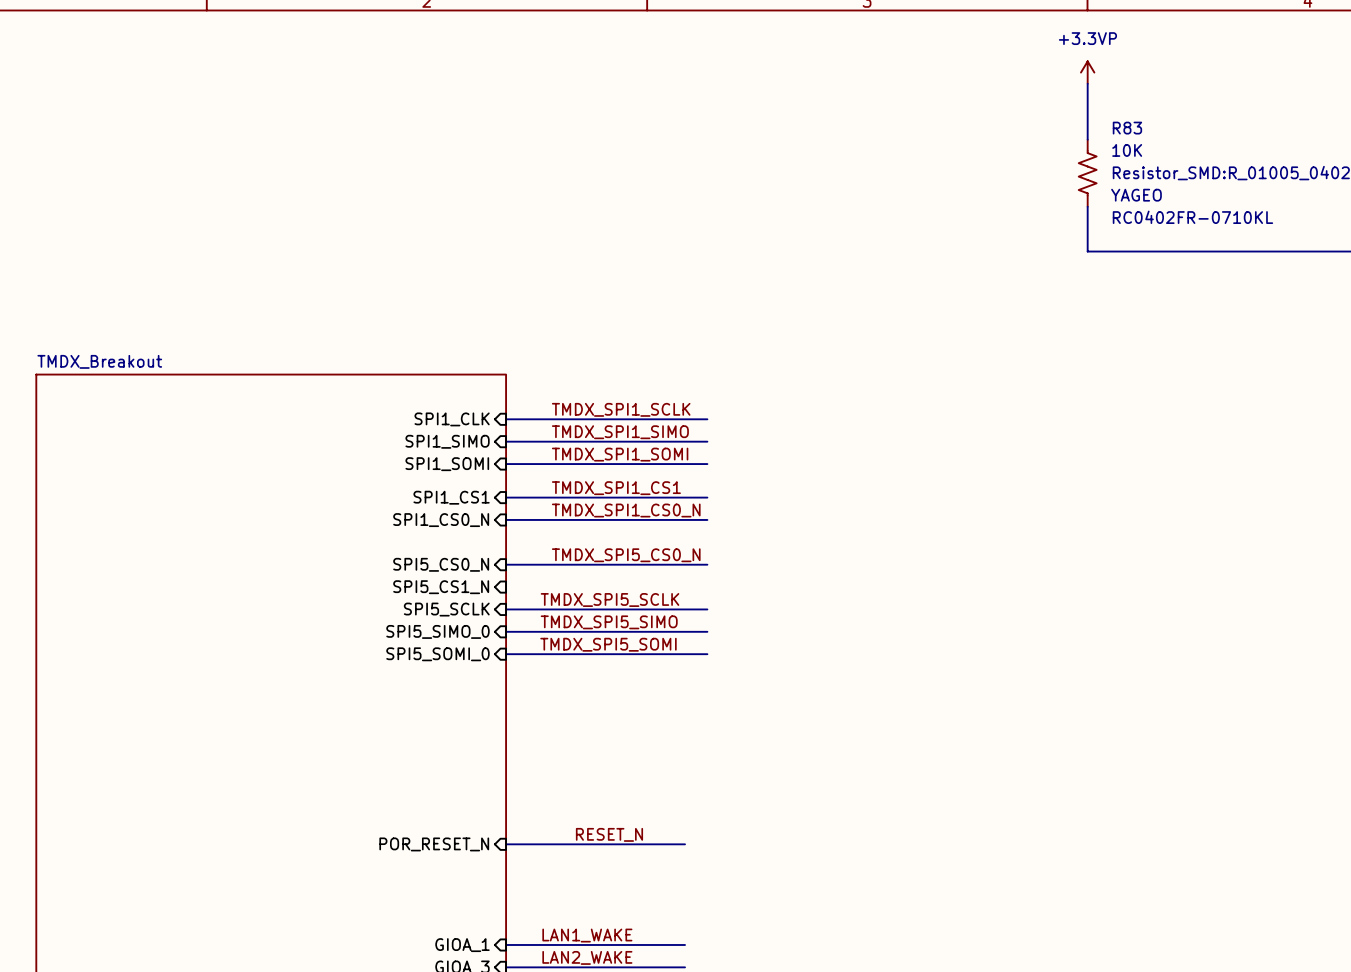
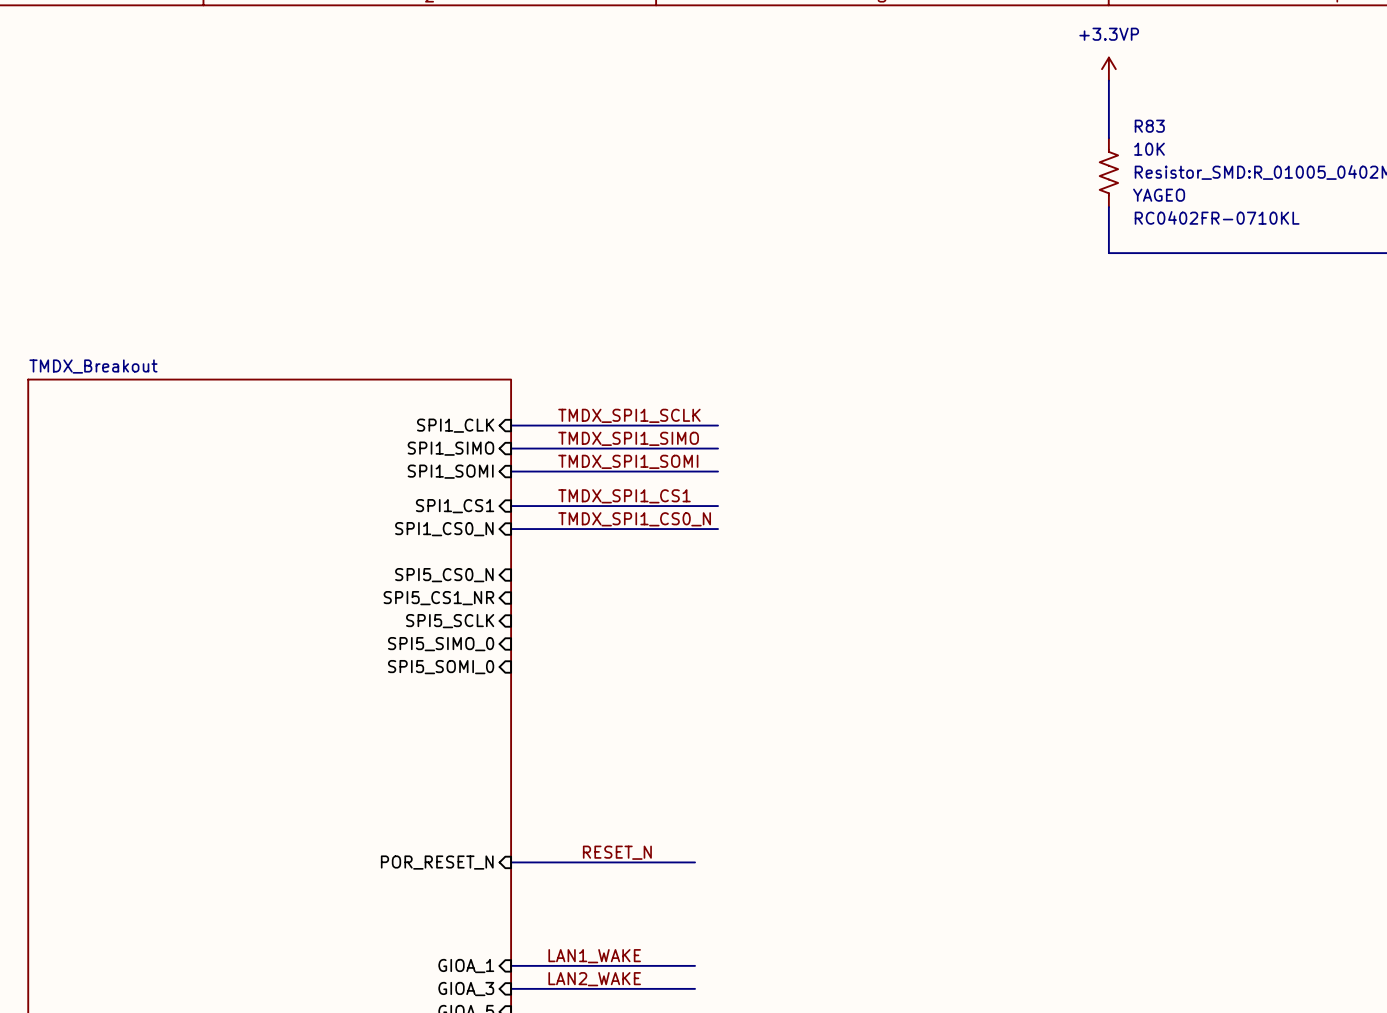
label: TMDX_SPI5_CS0_N (626, 555) -> none
wire: (506, 564) (707, 564) -> none
sheet pin: SPI5_CS1_N (441, 587) -> SPI5_CS1_NR (438, 598)
label: TMDX_SPI5_SCLK (610, 599) -> none
wire: (506, 609) (707, 609) -> none
label: TMDX_SPI5_SIMO (609, 622) -> none
wire: (506, 631) (707, 631) -> none
label: TMDX_SPI5_SOMI (608, 644) -> none
wire: (506, 654) (707, 654) -> none

